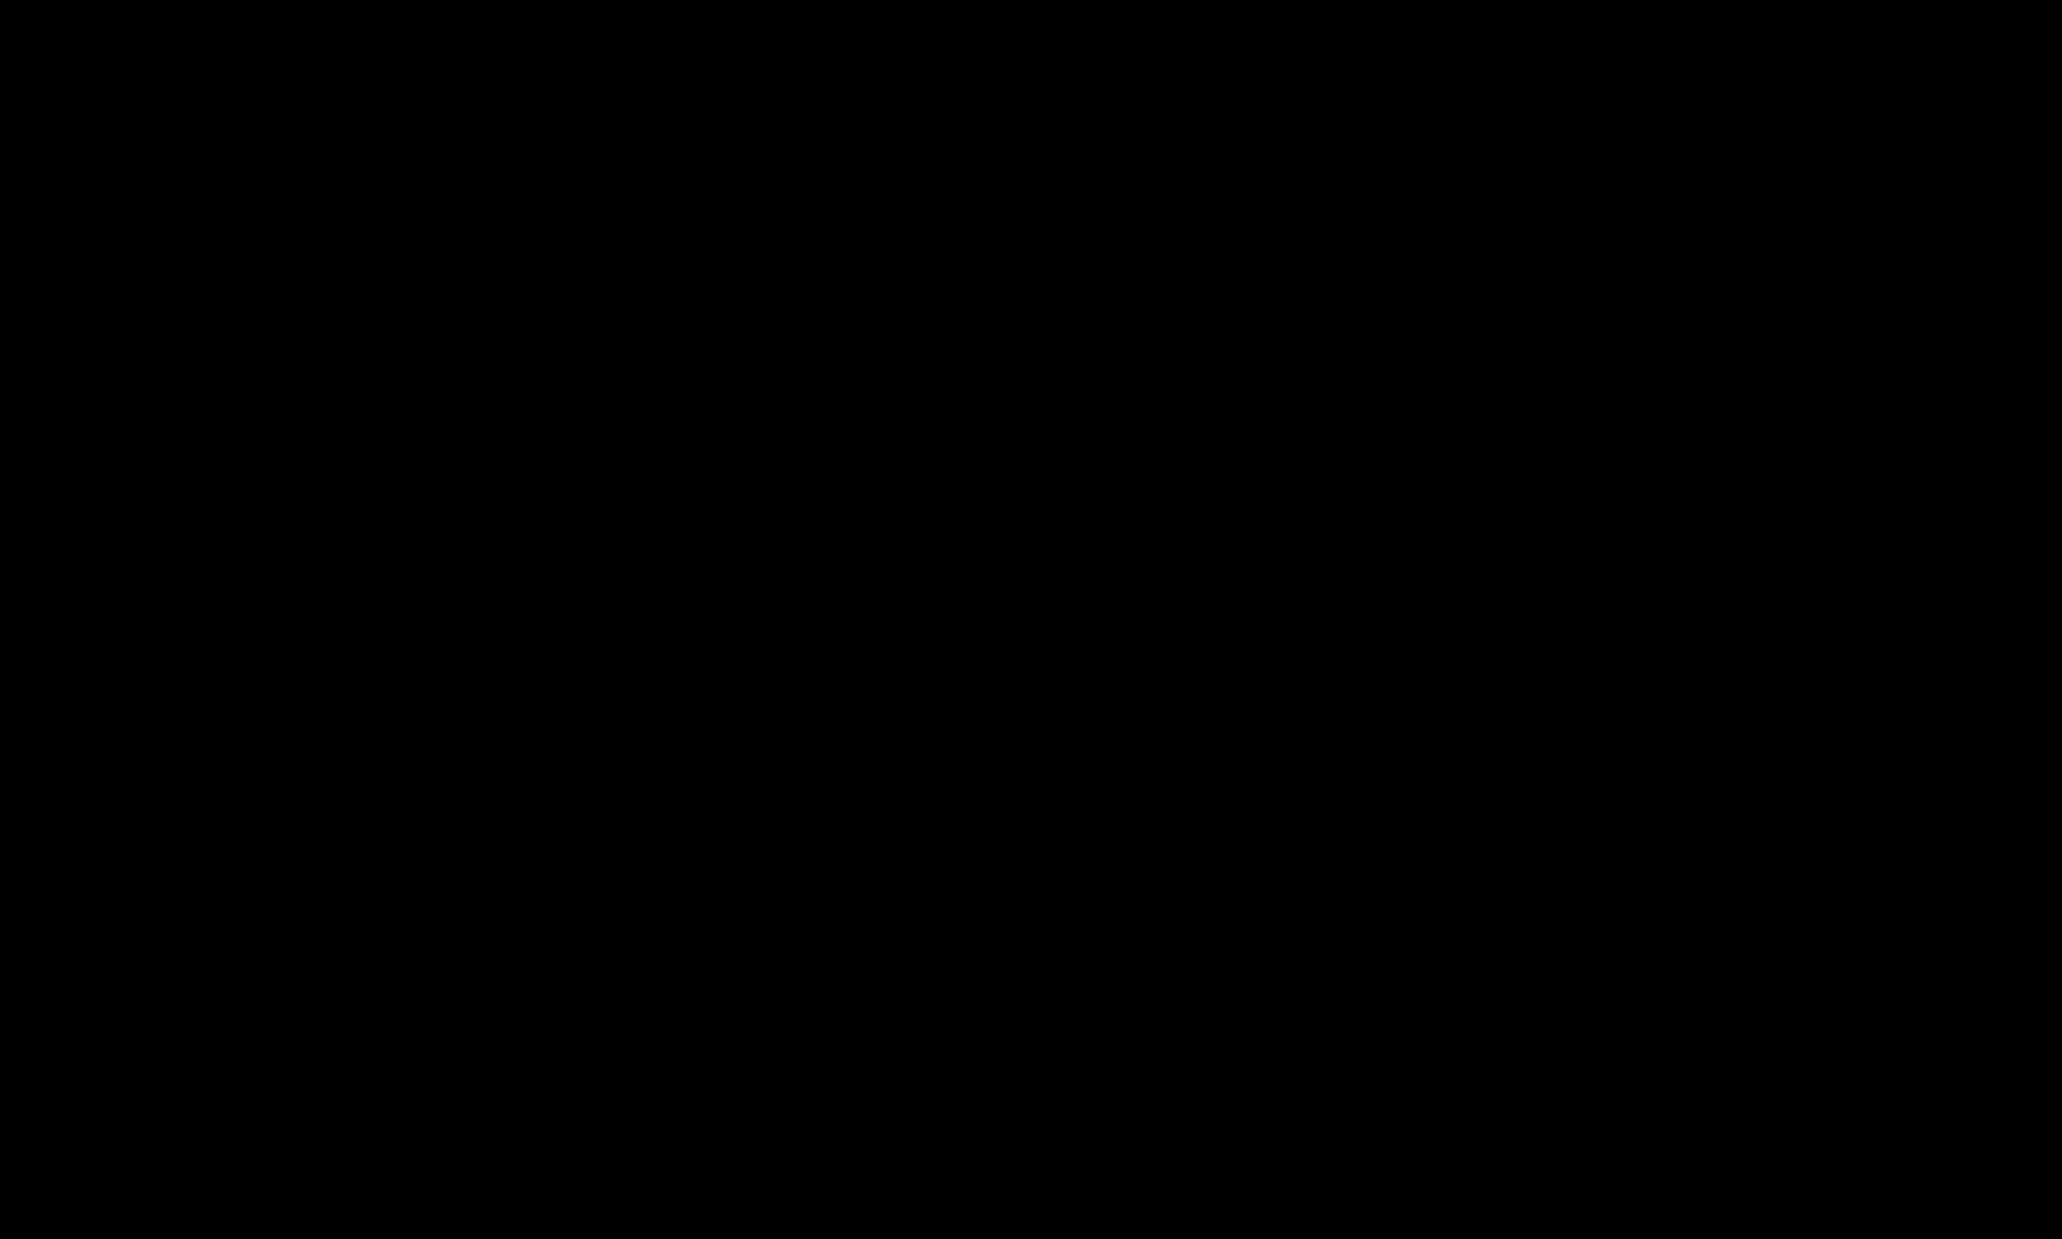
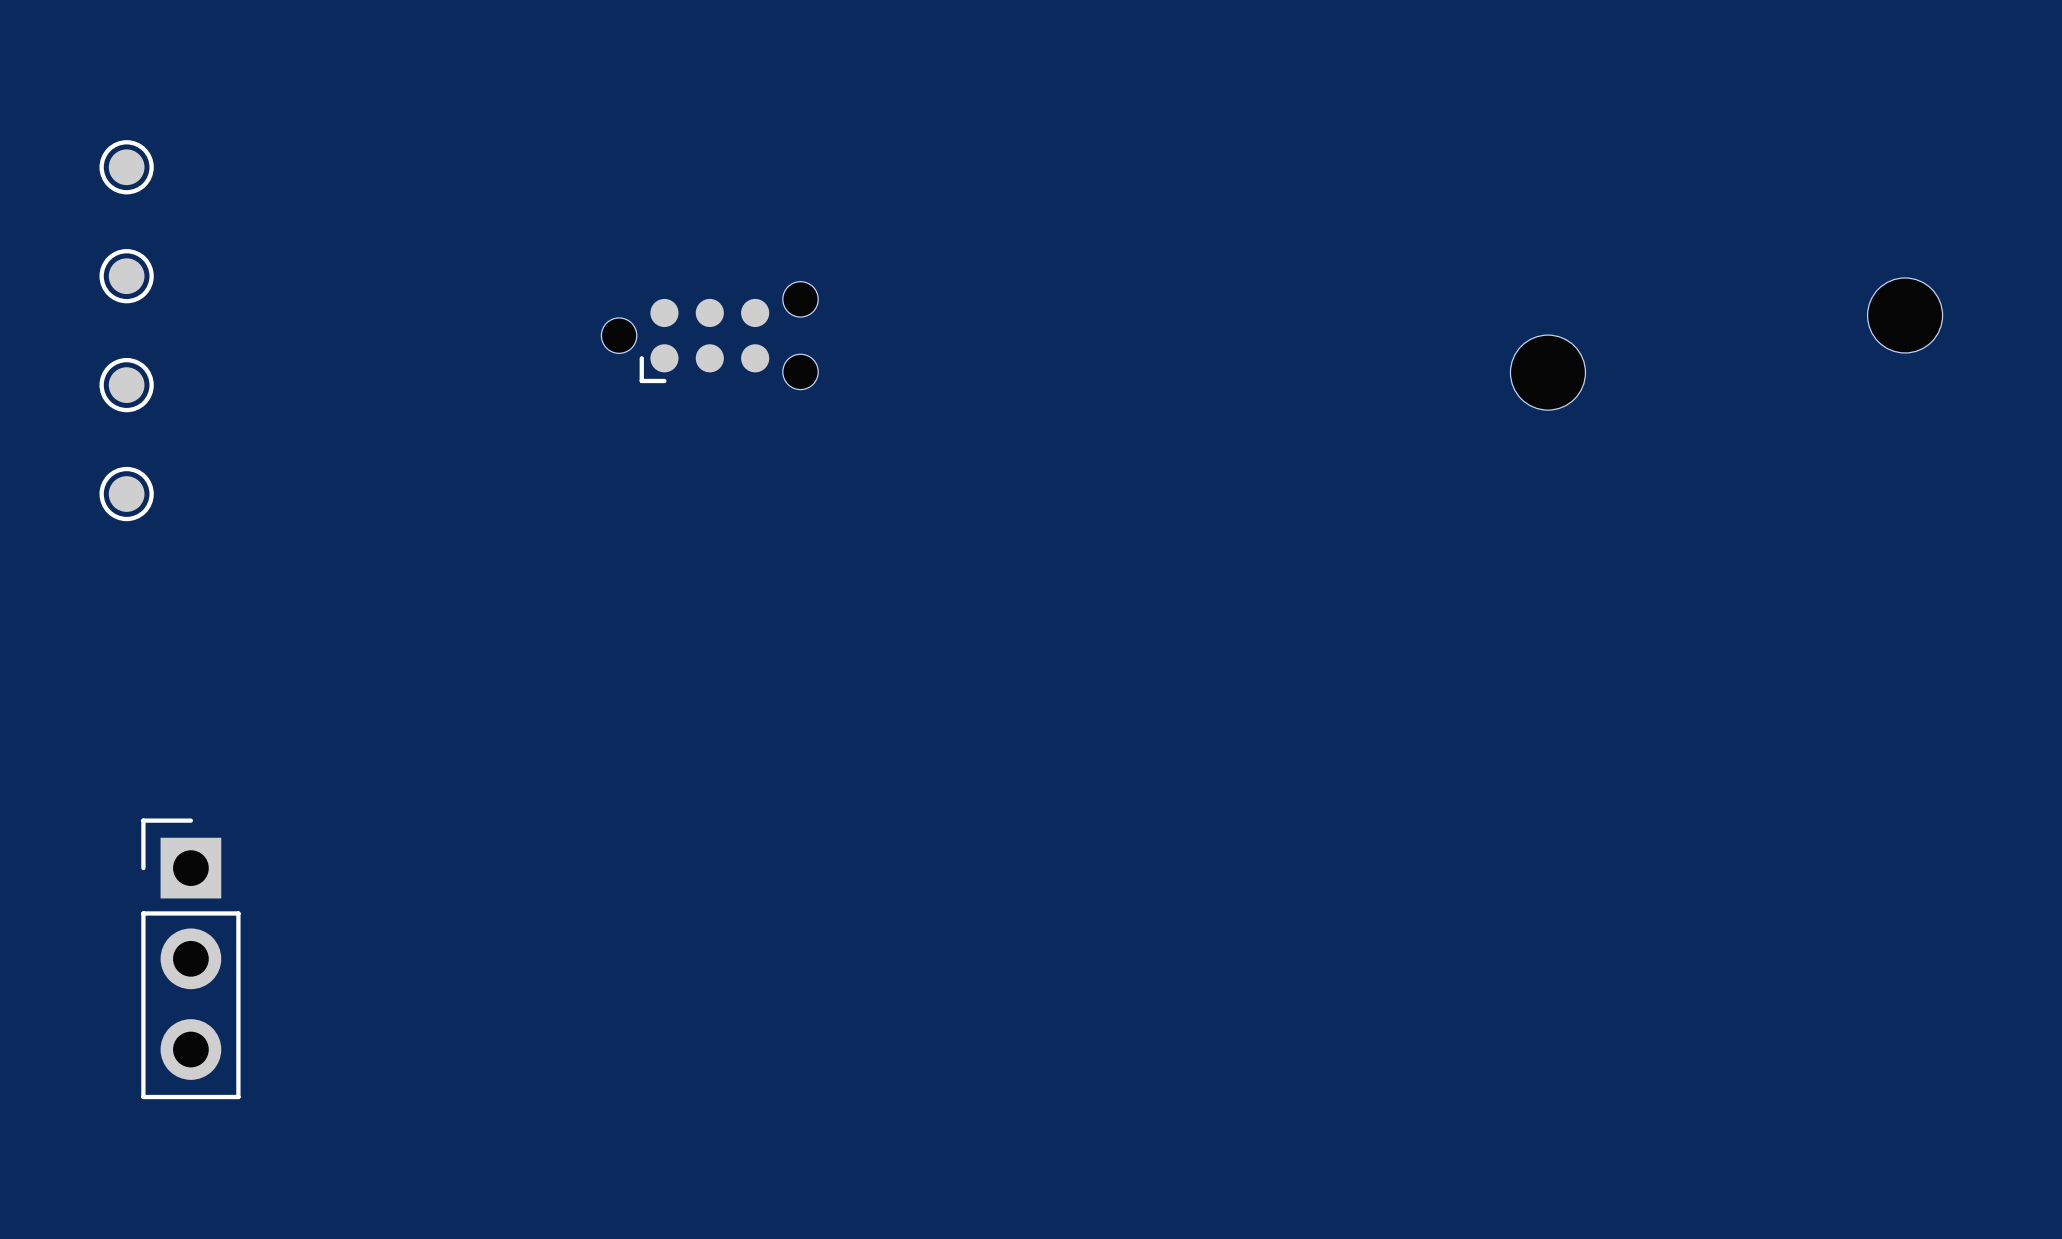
part: none -> (126, 167)
part: none -> (126, 276)
part: none -> (1905, 315)
part: none -> (709, 335)
part: none -> (1547, 372)
part: none -> (126, 385)
part: none -> (126, 494)
part: none -> (190, 958)

